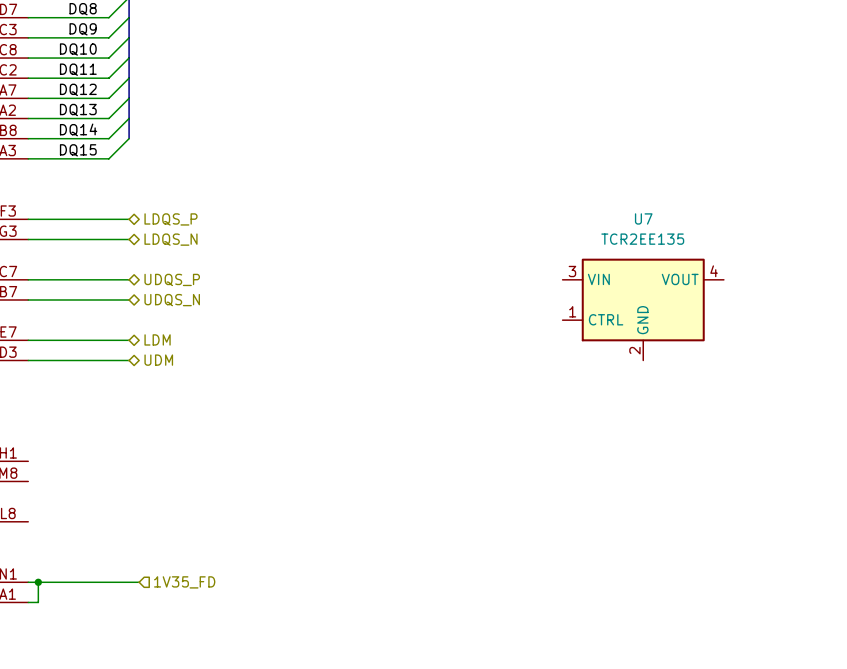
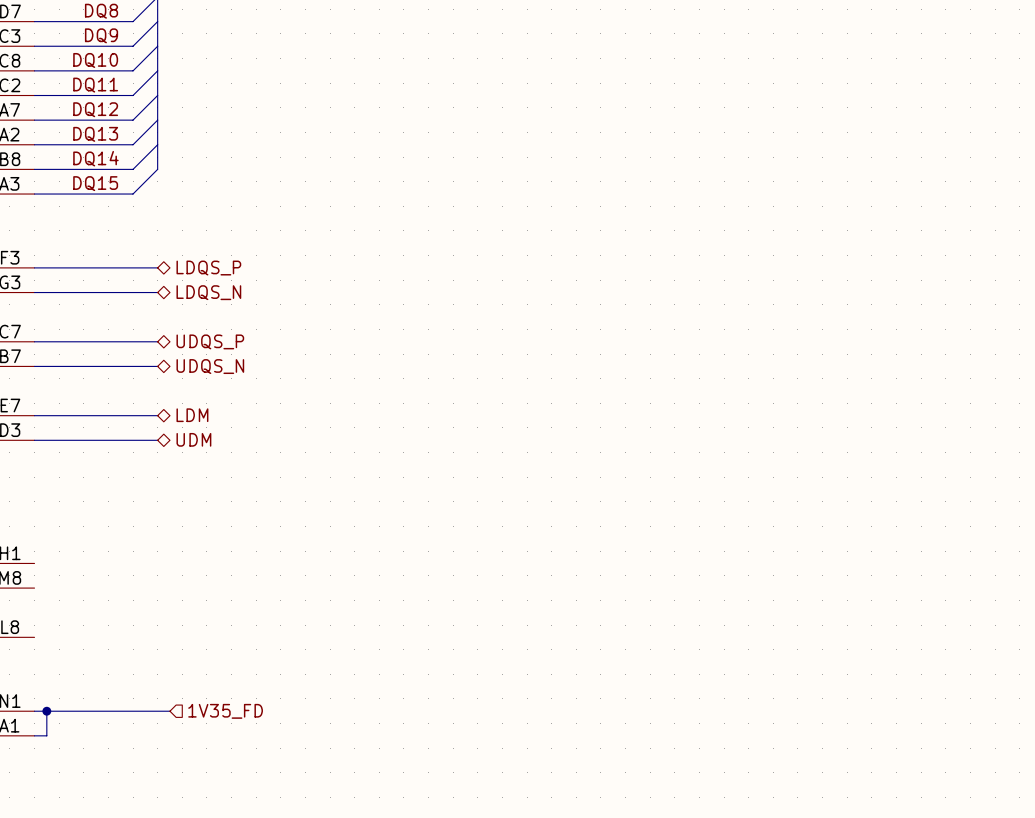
U7: TCR2EE135 (643, 309) -> none

